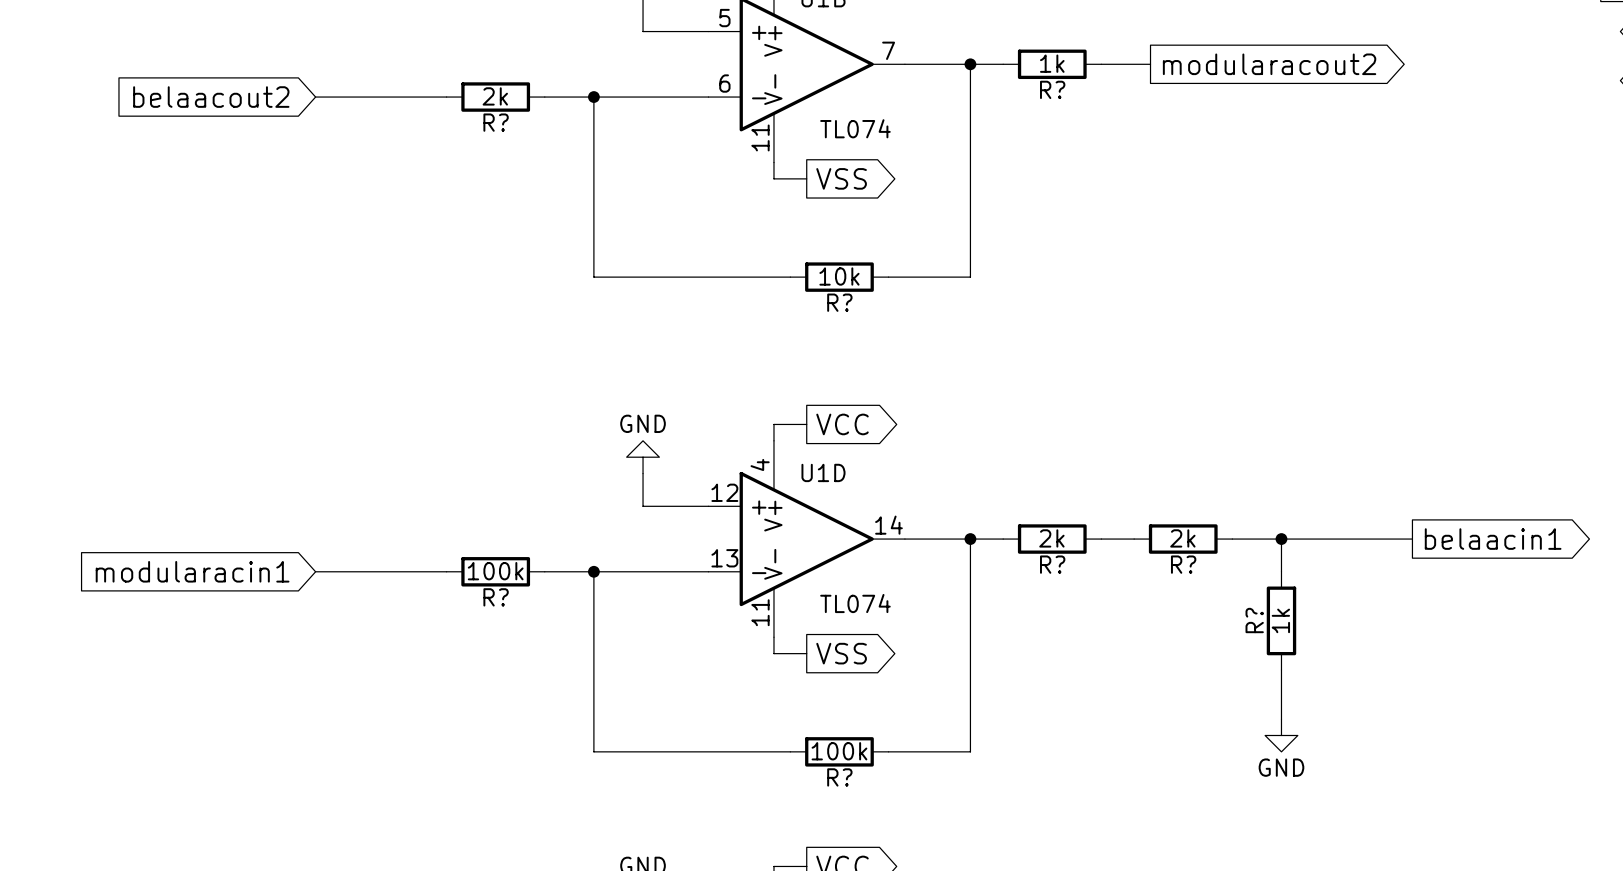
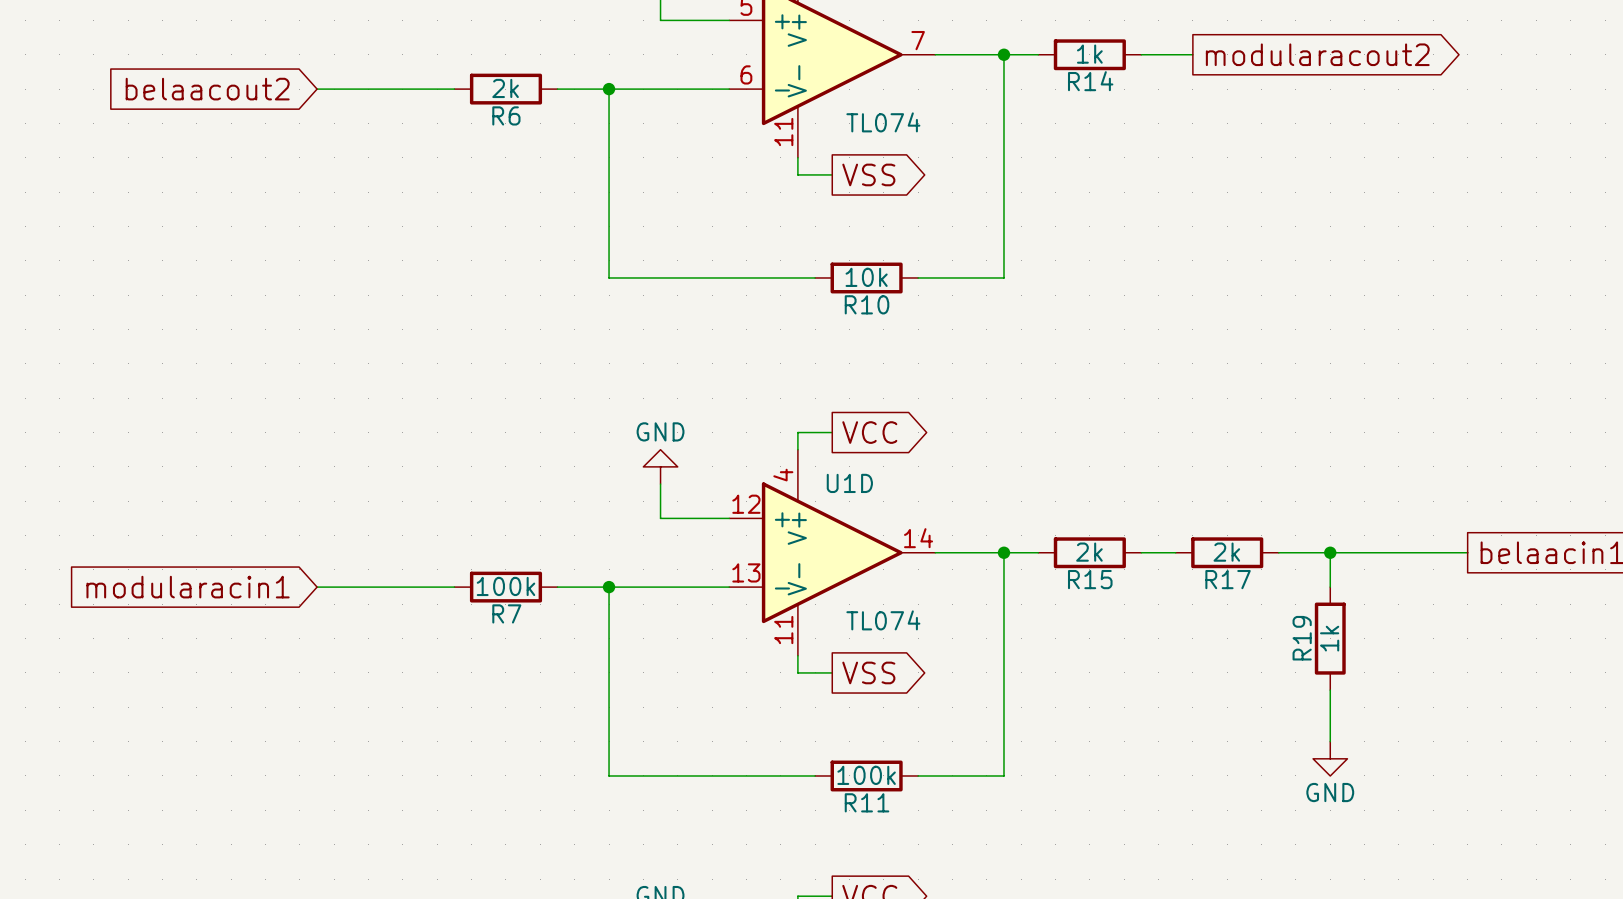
R? name: R? (1052, 89) -> R14 (1090, 81)
R? name: R? (496, 122) -> R6 (506, 115)
R? name: R? (839, 302) -> R10 (867, 304)
R? name: R? (1052, 564) -> R15 (1090, 579)
R? name: R? (1183, 564) -> R17 (1228, 579)
R? name: R? (496, 597) -> R7 (506, 613)
R? name: R? (1254, 620) -> R19 (1302, 638)
R? name: R? (839, 777) -> R11 (867, 802)

